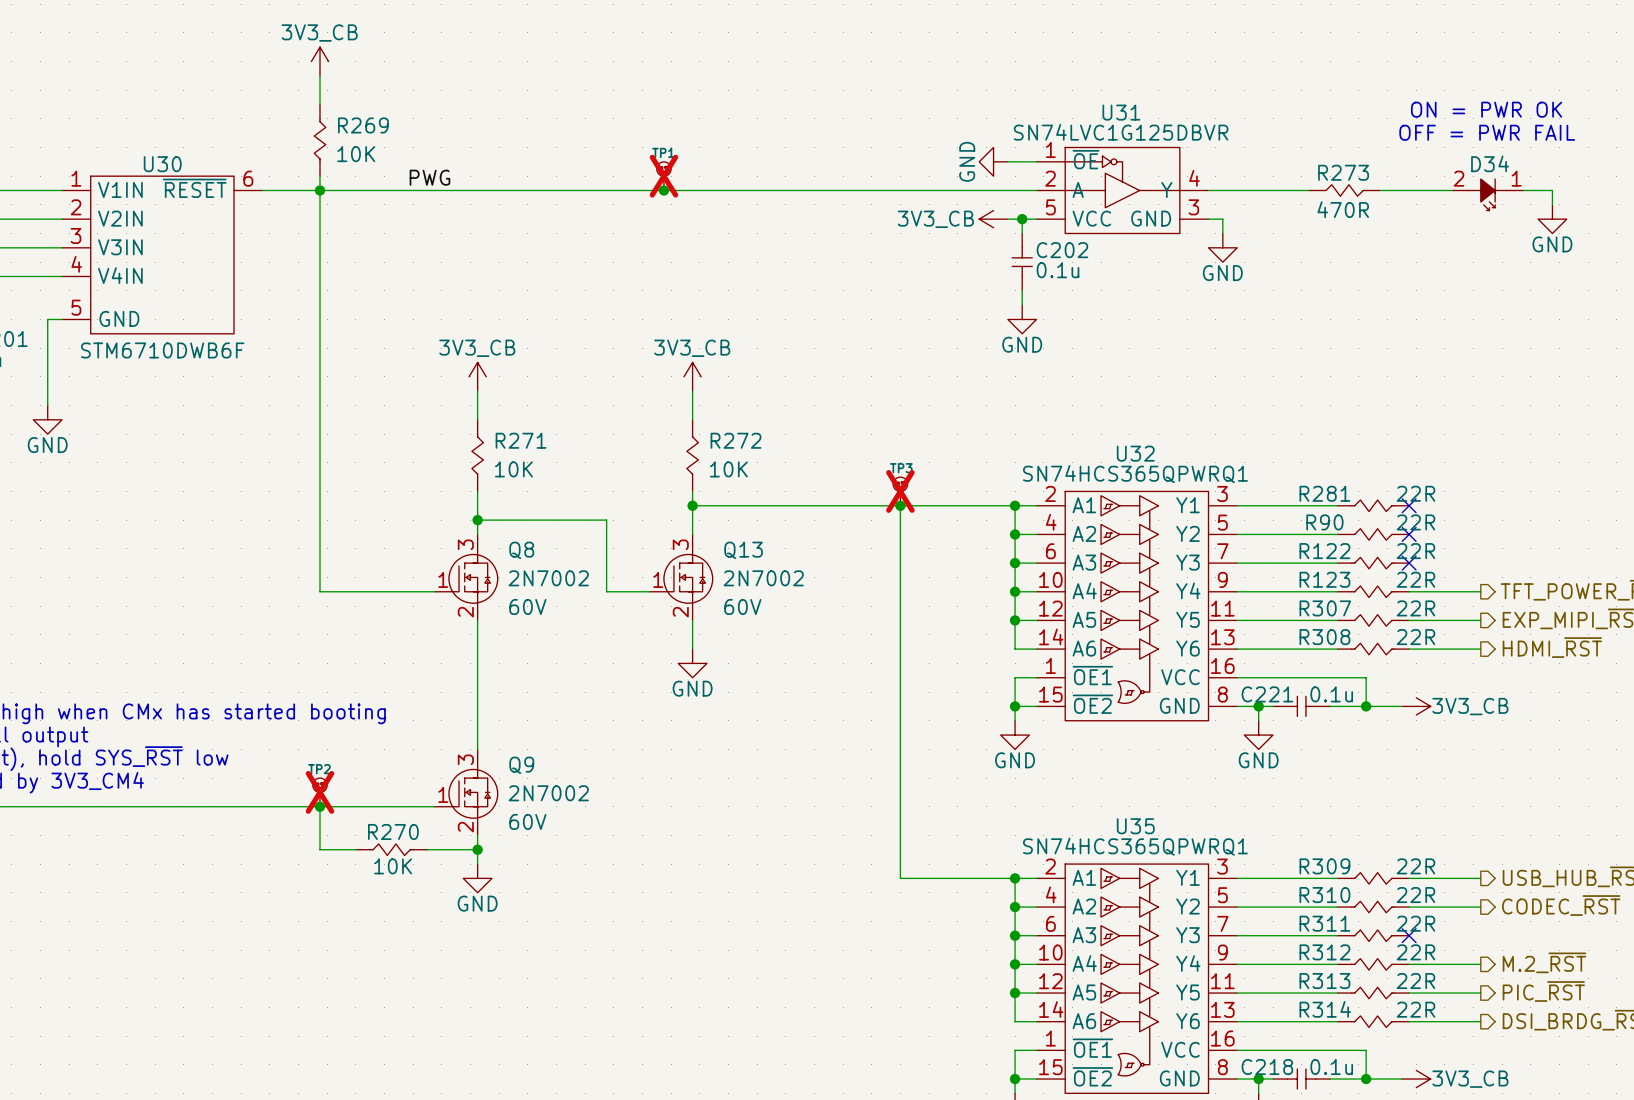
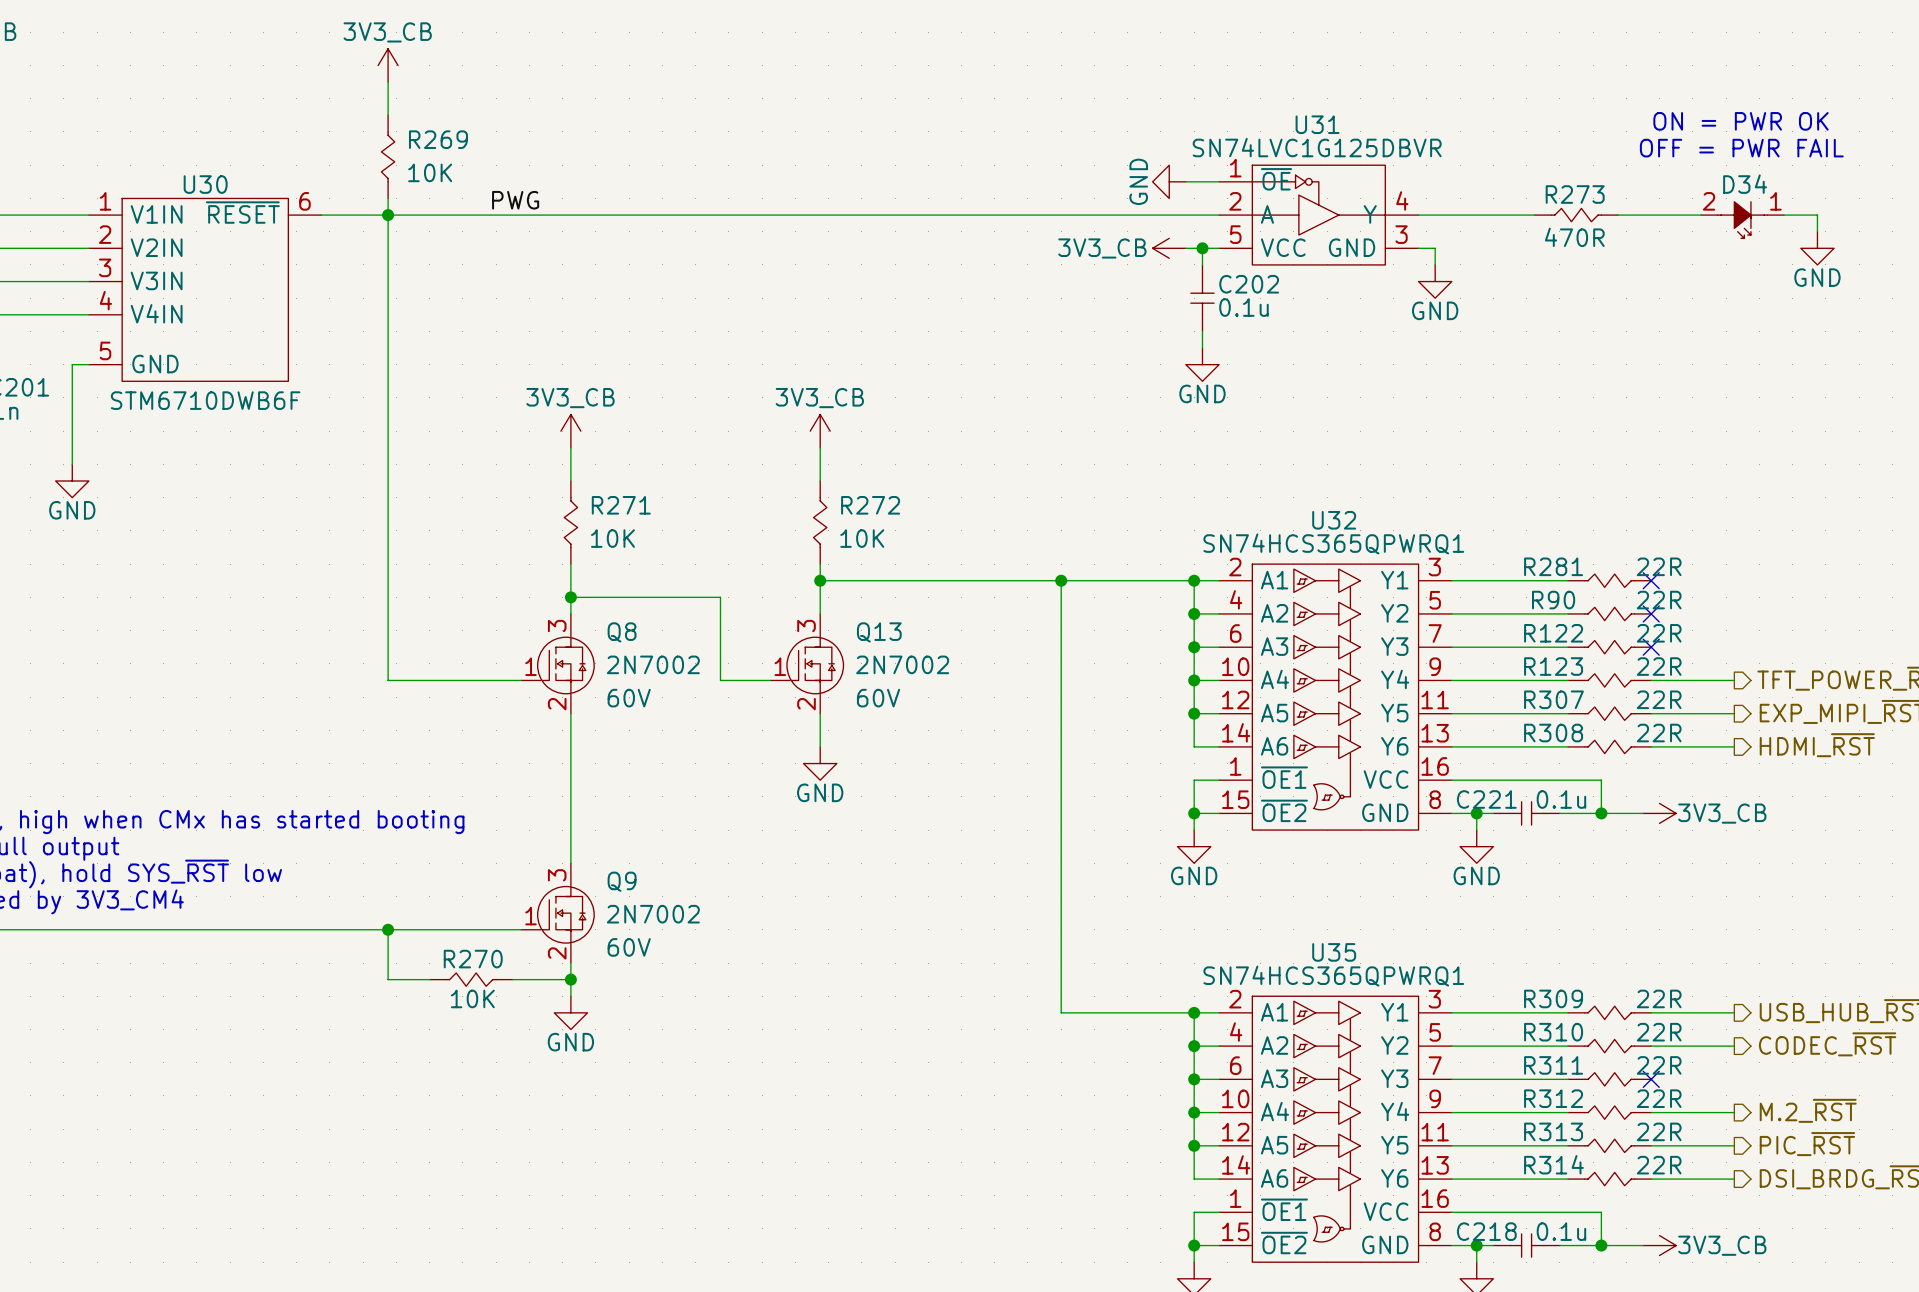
TP1: (663, 176) -> none
junction: (663, 190) -> none
TP3: (900, 491) -> none
TP2: (319, 792) -> none

